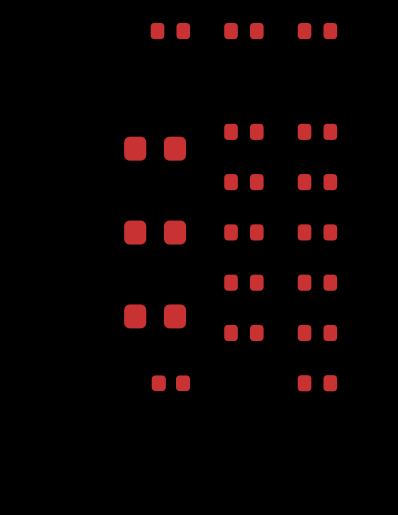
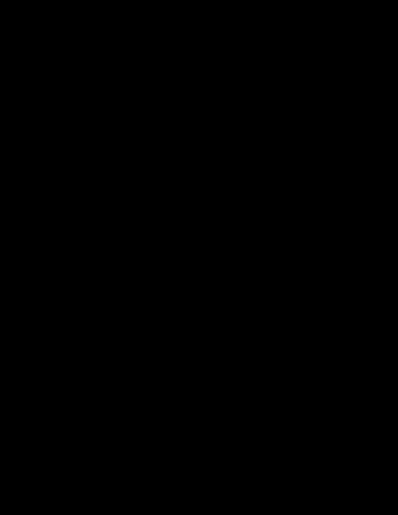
part: (170, 31) -> none
part: (243, 31) -> none
part: (317, 31) -> none
part: (243, 131) -> none
part: (317, 131) -> none
part: (155, 148) -> none
part: (243, 182) -> none
part: (317, 182) -> none
part: (155, 232) -> none
part: (243, 232) -> none
part: (317, 232) -> none
part: (243, 282) -> none
part: (317, 282) -> none
part: (155, 316) -> none
part: (243, 332) -> none
part: (317, 332) -> none
part: (170, 383) -> none
part: (317, 383) -> none

